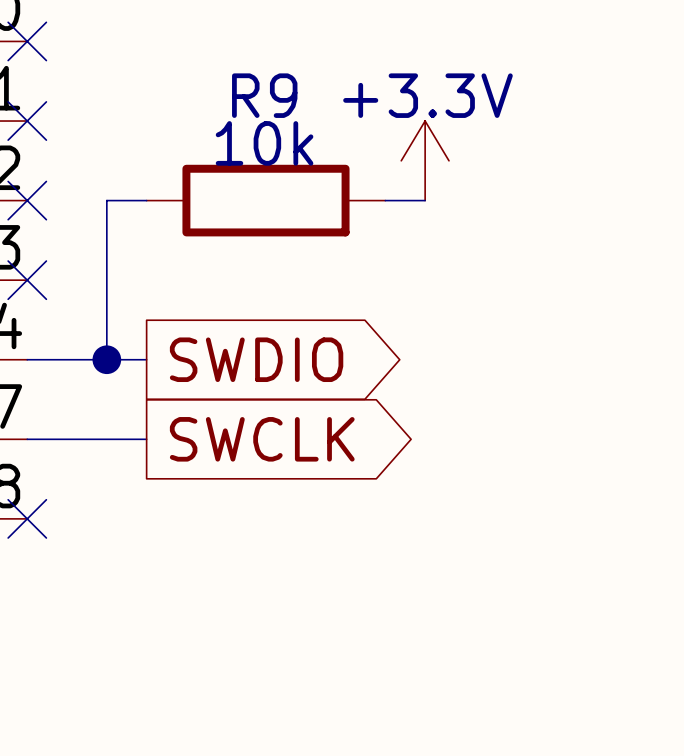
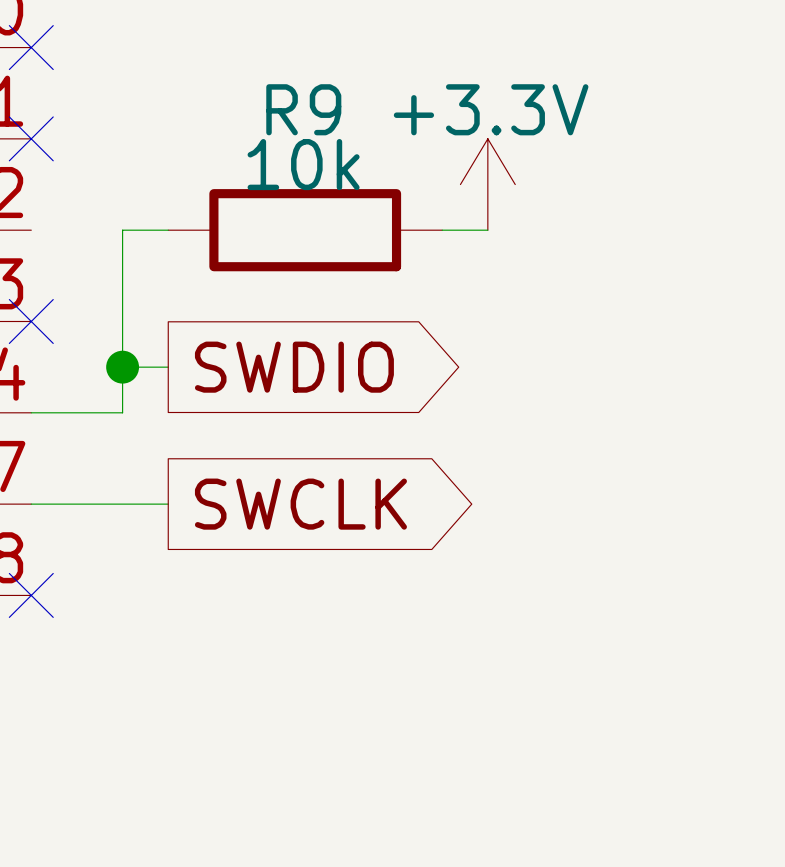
no-connect mark: (27, 200) -> none
wire: (106, 359) (146, 359) -> (122, 367) (168, 367)
junction position: (106, 359) -> (122, 367)
global label position: SWDIO (256, 359) -> SWDIO (294, 367)

